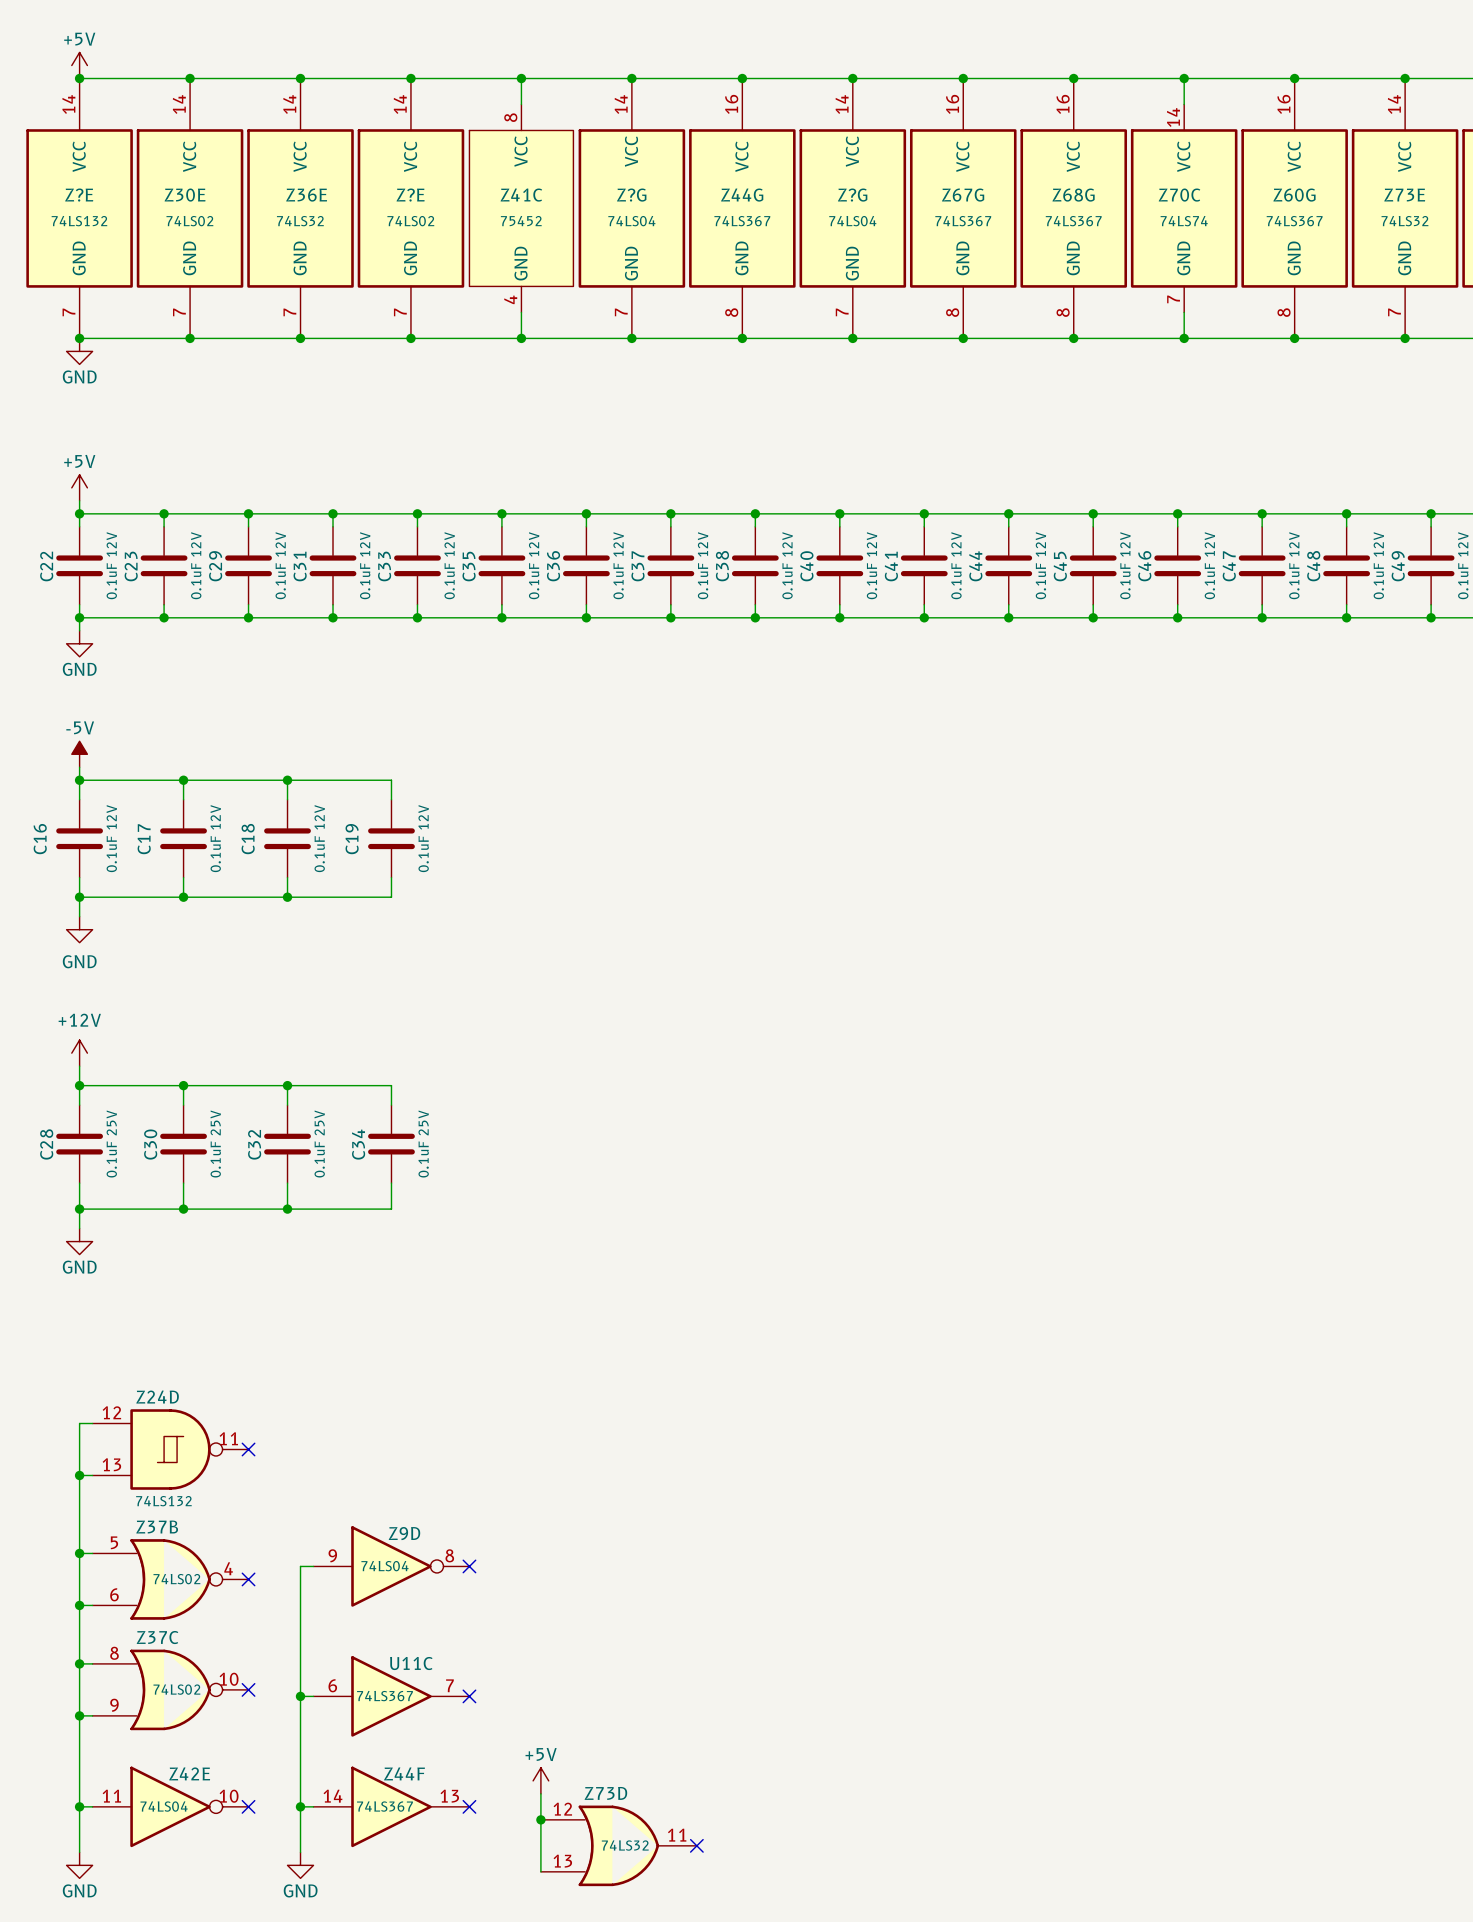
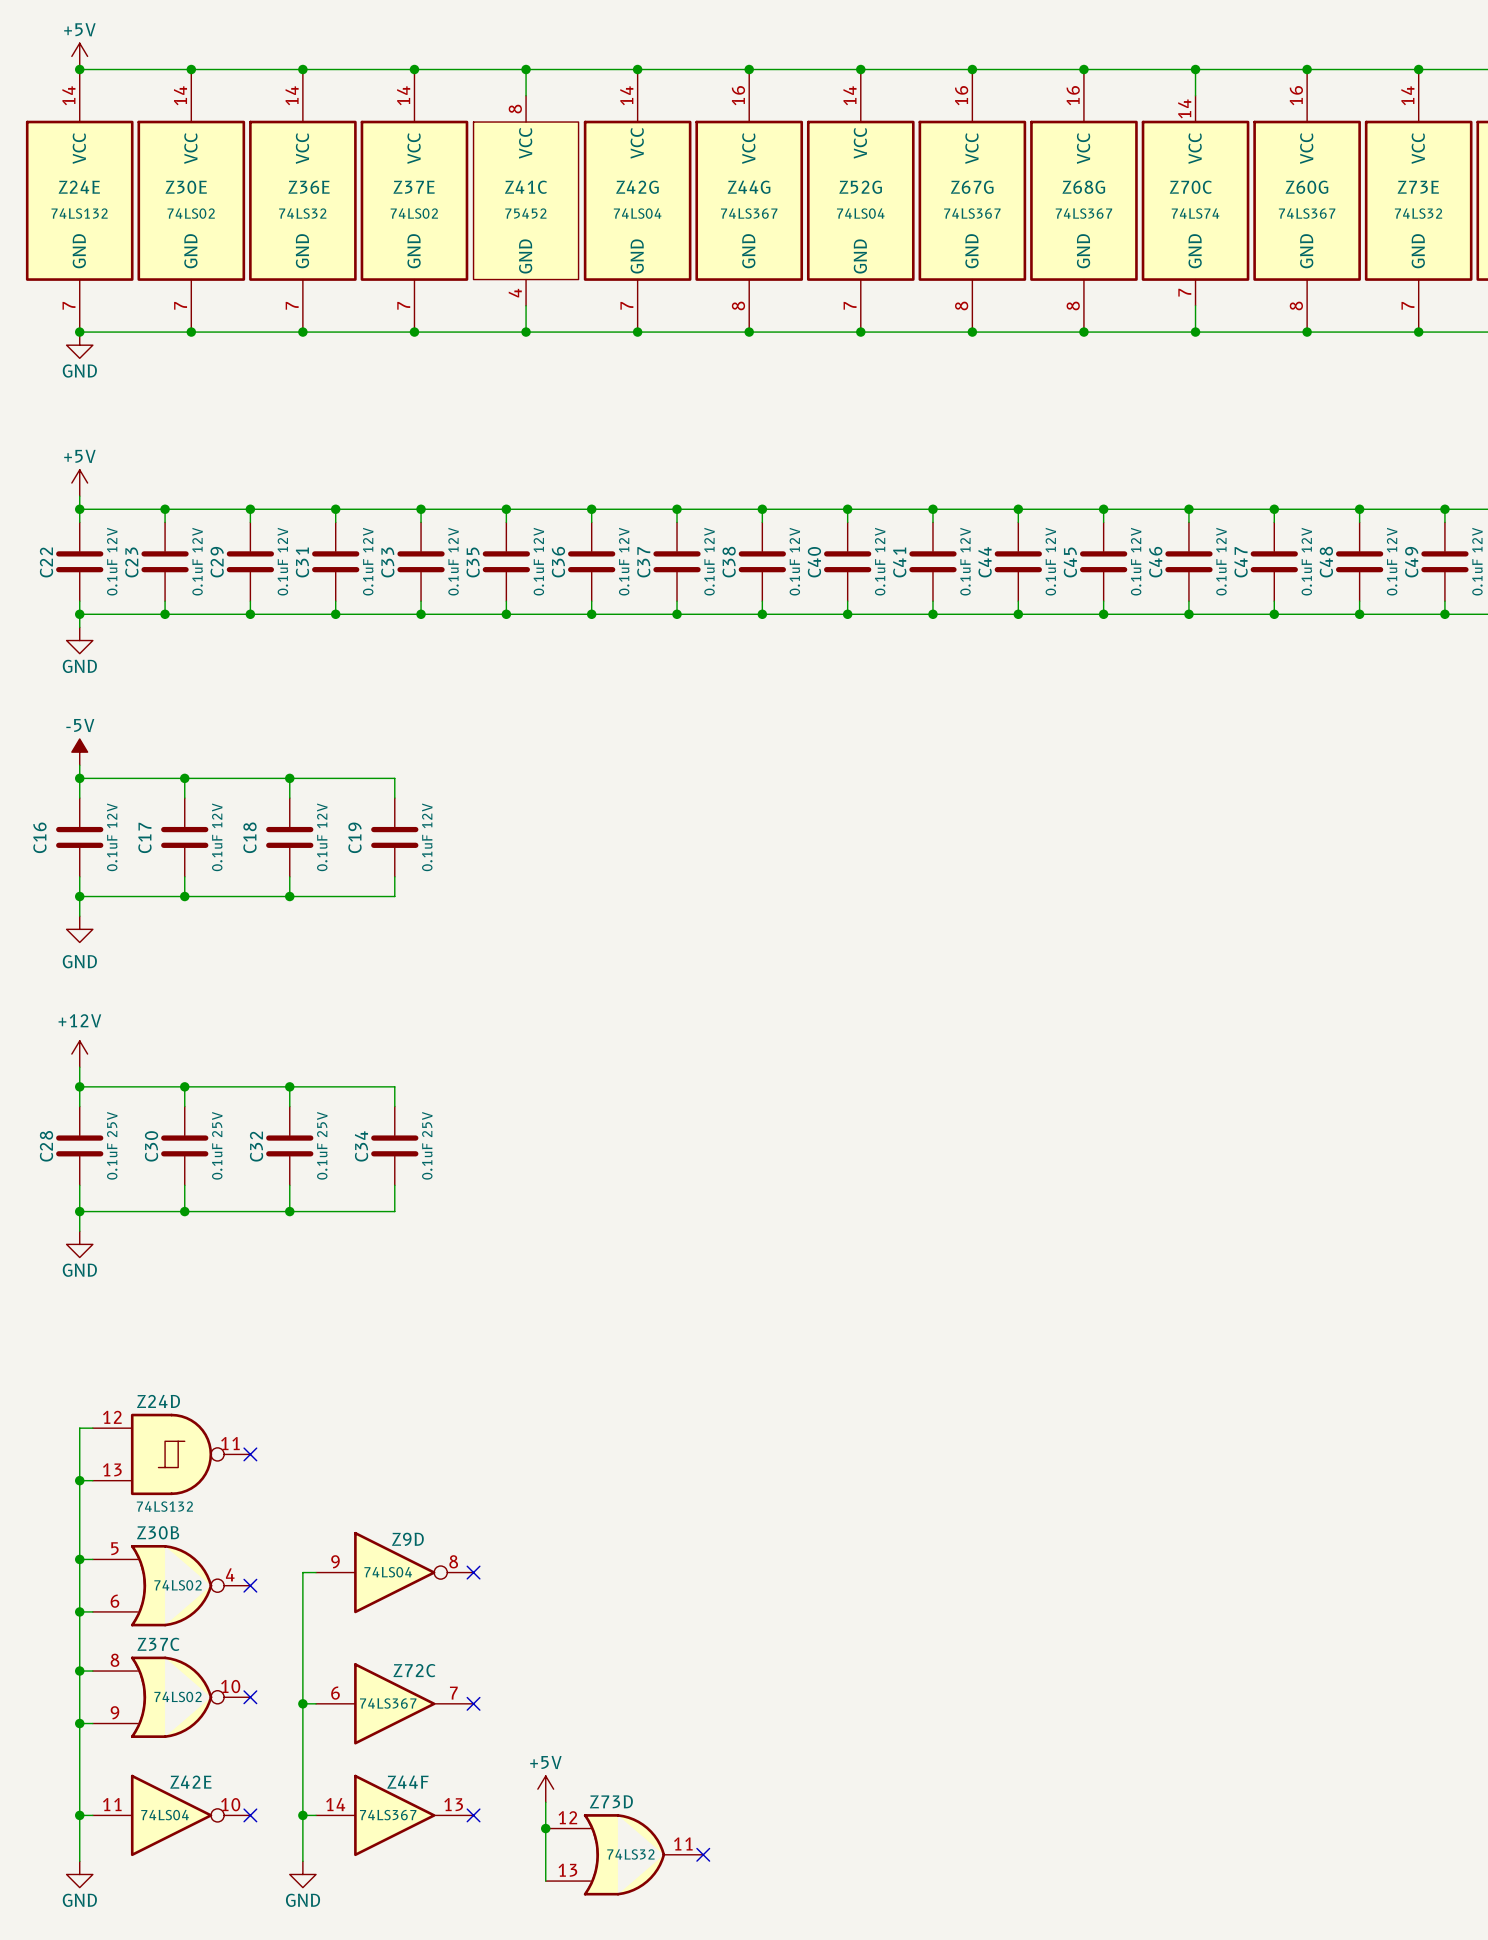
Z?E name: Z?E (79, 195) -> Z24E (79, 187)
Z?E name: Z?E (410, 195) -> Z37E (414, 187)
Z?G name: Z?G (631, 195) -> Z42G (637, 187)
Z?G name: Z?G (852, 195) -> Z52G (860, 187)
Z37B name: Z37B (157, 1527) -> Z30B (158, 1532)
U11C name: U11C (411, 1663) -> Z72C (414, 1670)

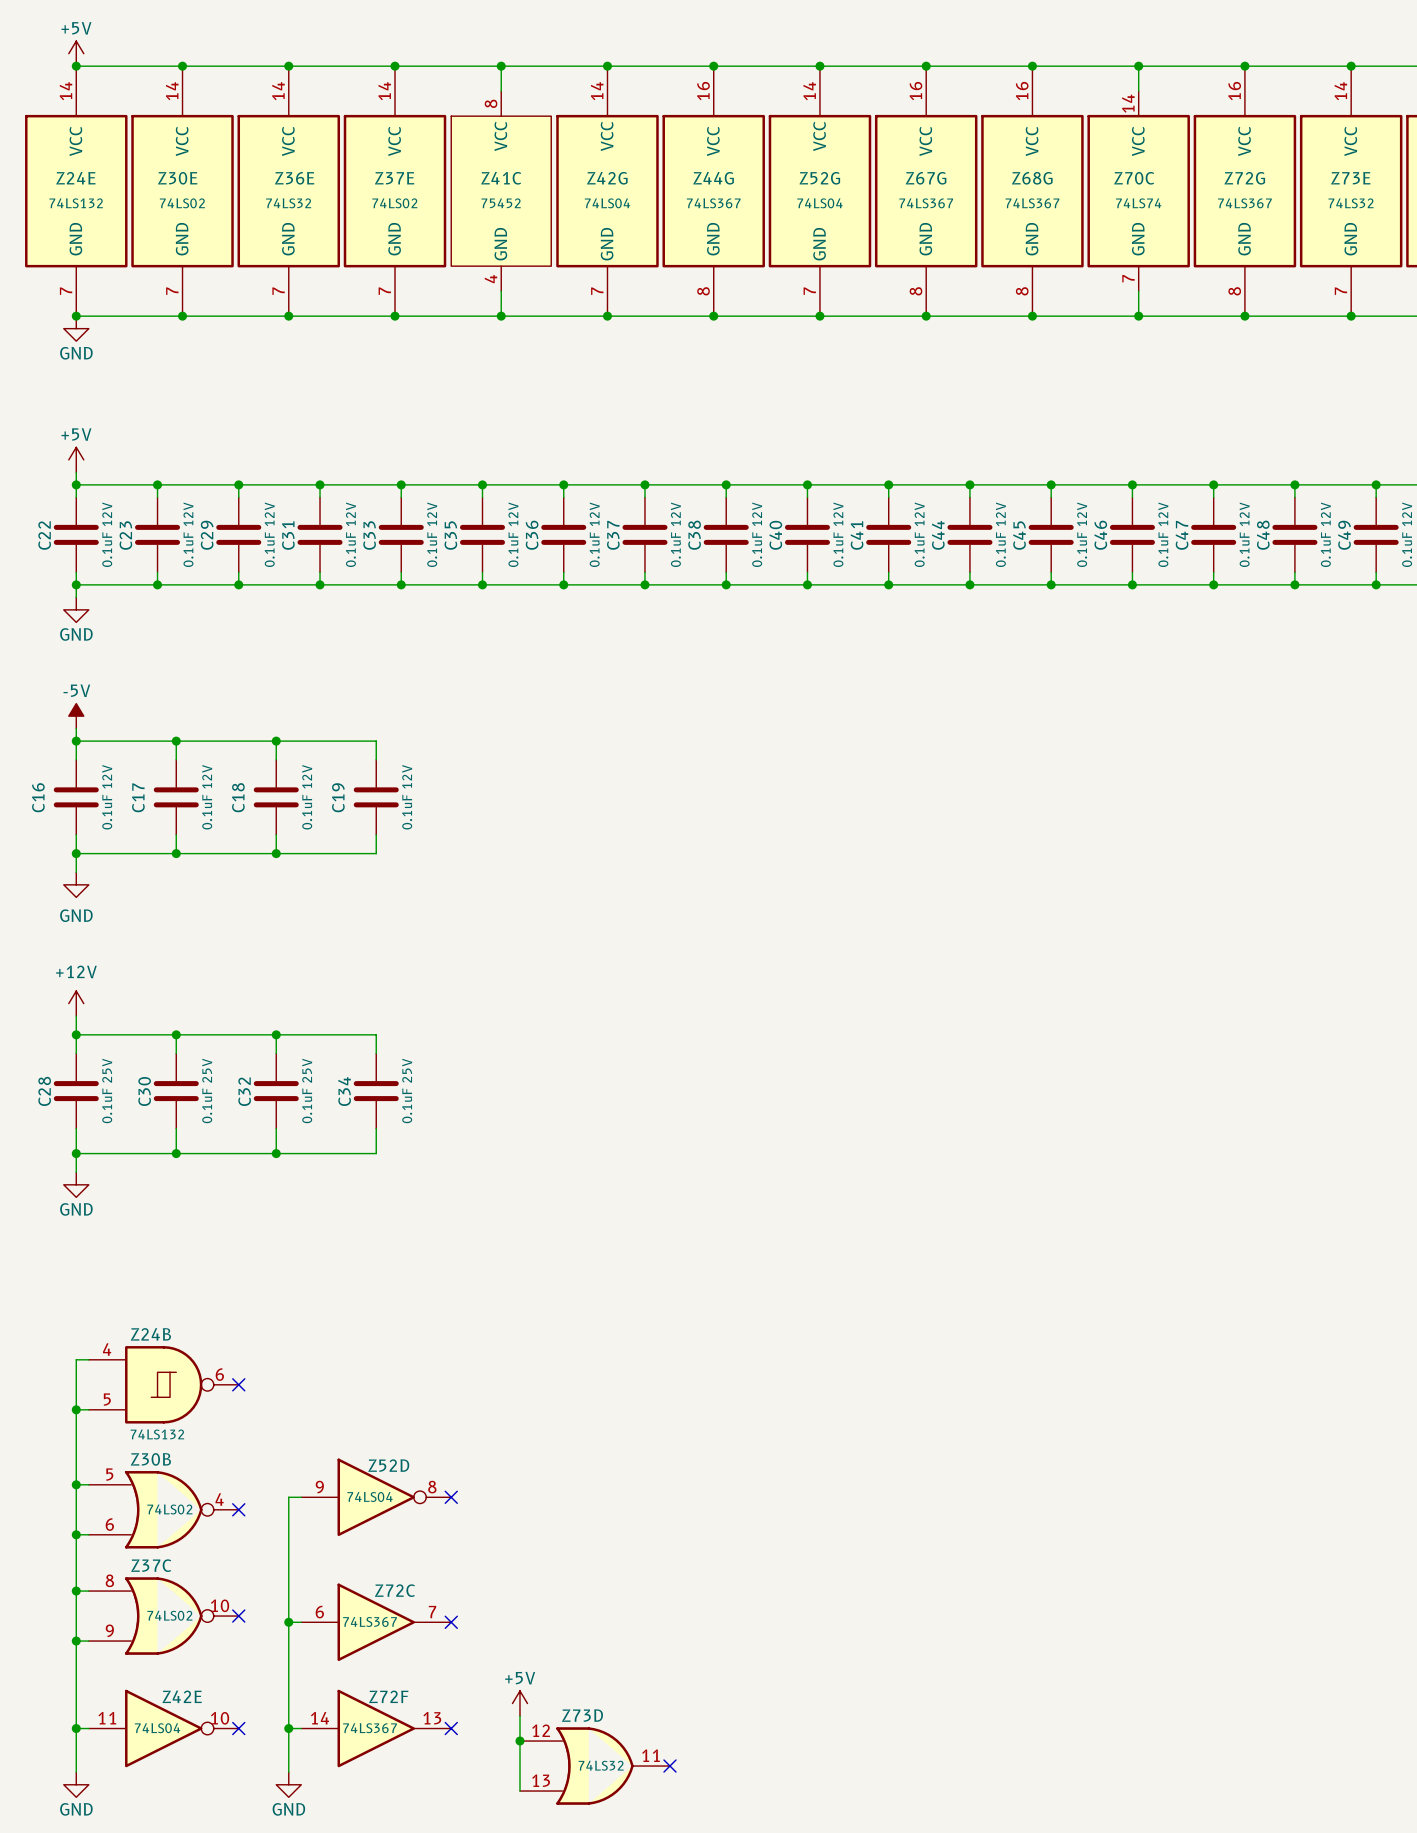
Z60G name: Z60G (1306, 187) -> Z72G (1244, 178)
Z24D name: Z24D (158, 1401) -> Z24B (150, 1334)
Z24D pin number: 12 (112, 1417) -> 4 (107, 1349)
Z24D pin number: 11 (230, 1443) -> 6 (219, 1374)
Z24D pin number: 13 (112, 1469) -> 5 (107, 1399)
Z9D name: Z9D (407, 1539) -> Z52D (388, 1465)
Z44F name: Z44F (407, 1782) -> Z72F (388, 1696)

